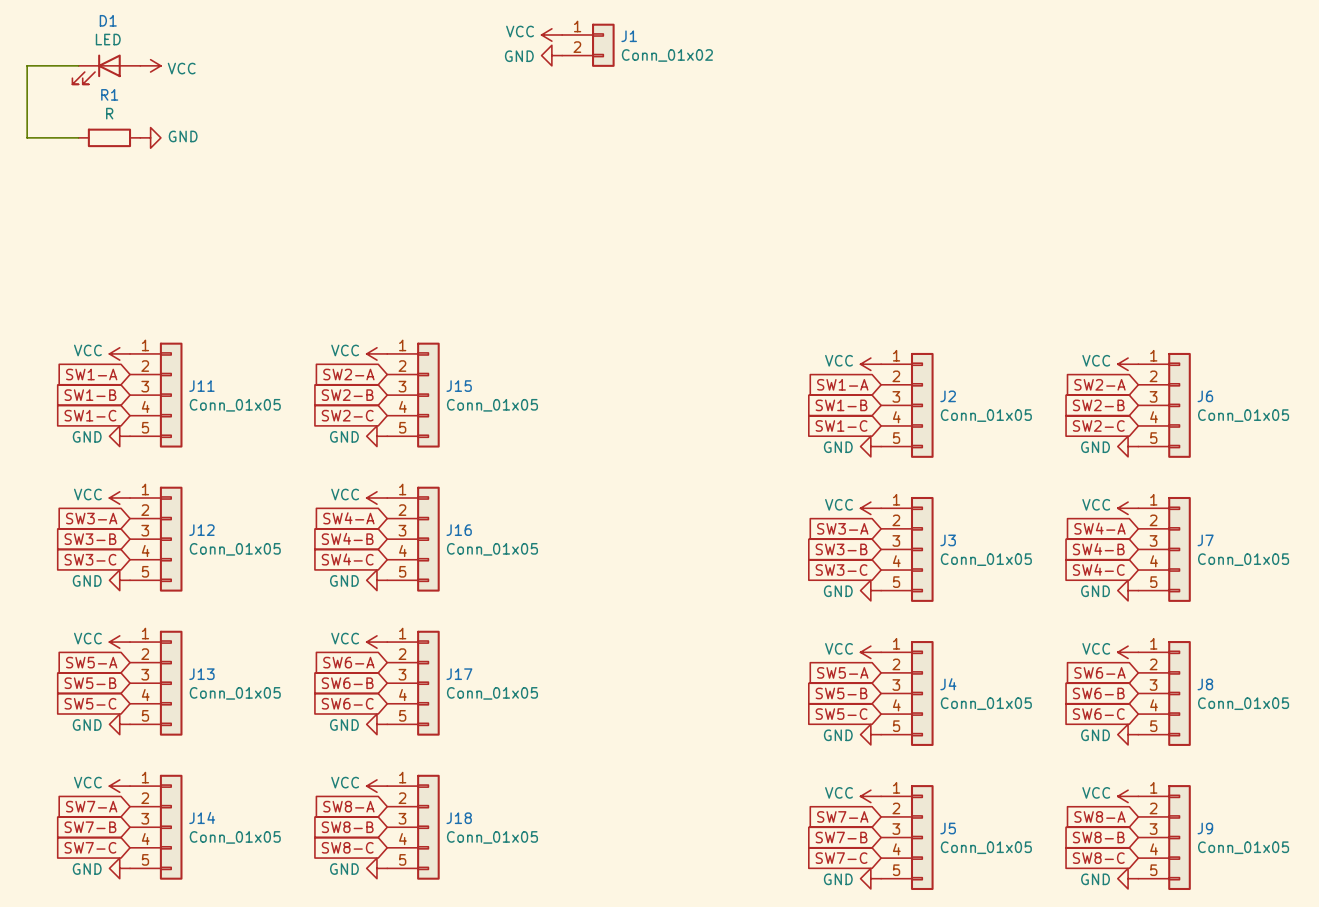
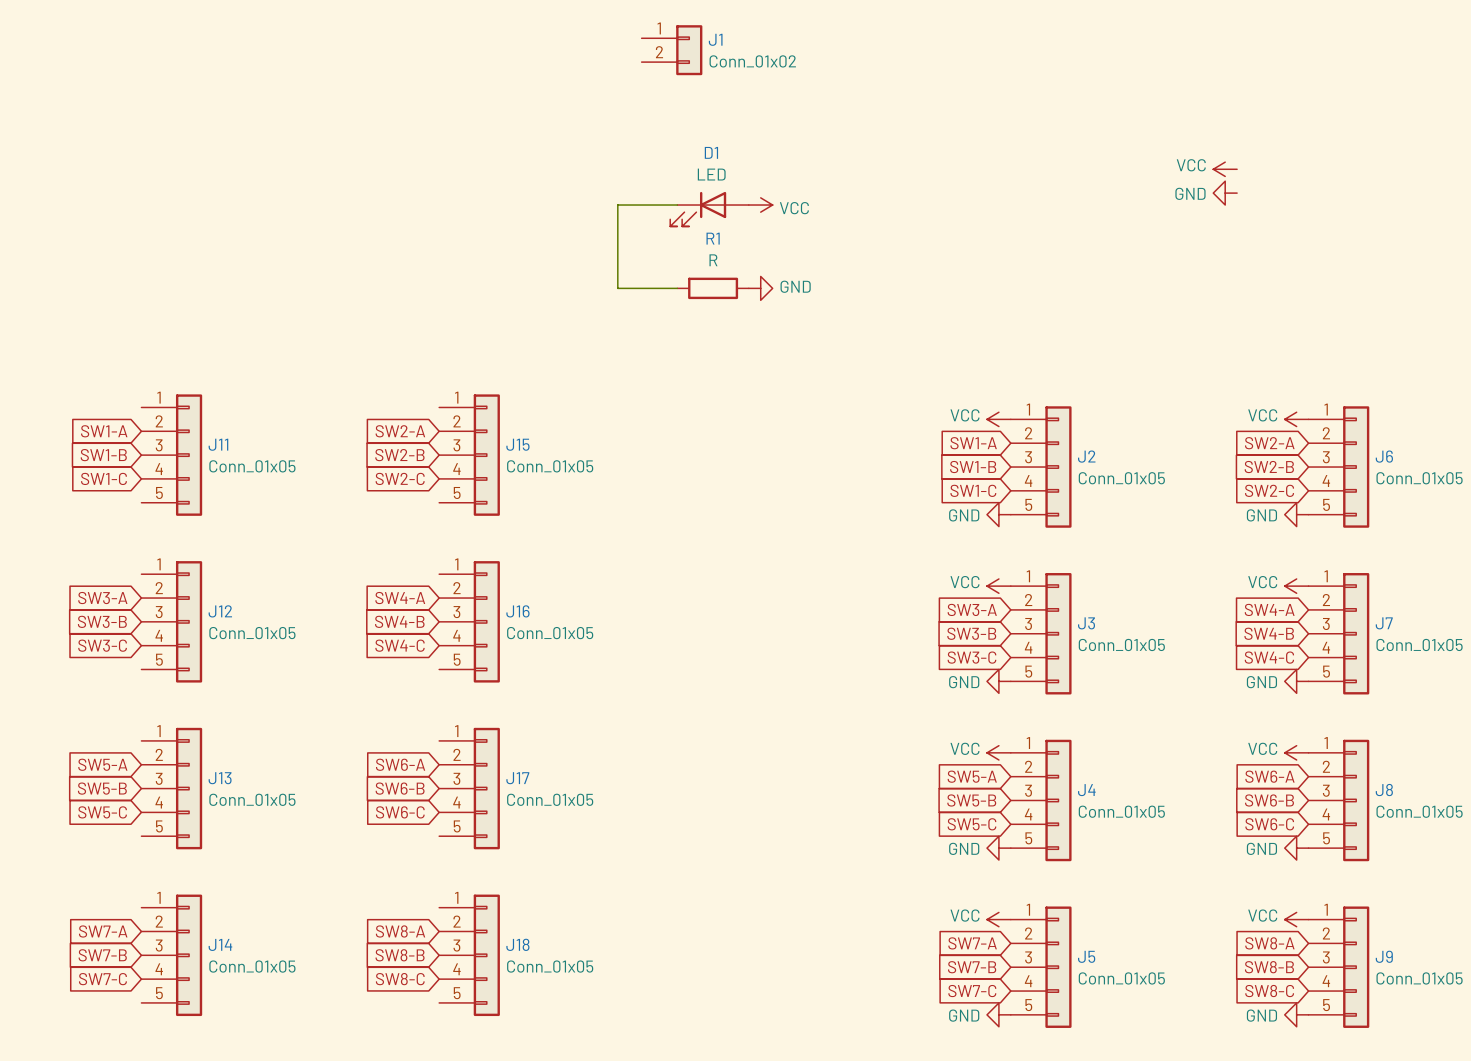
power symbol: VCC (551, 34) -> none
power symbol: GND (551, 55) -> none
wire: (78, 65) (27, 65) (27, 137) (78, 137) -> none
power symbol: VCC (150, 65) -> none
D1 position: (106, 69) -> (709, 209)
R1 position: (109, 137) -> (713, 288)
power symbol: GND (150, 137) -> none
power symbol: none -> VCC (1225, 169)
power symbol: none -> GND (1225, 193)
wire: none -> (677, 205) (617, 205) (617, 288) (677, 288)
power symbol: none -> VCC (760, 205)
power symbol: none -> GND (760, 288)
power symbol: VCC (119, 353) -> none
power symbol: VCC (376, 353) -> none
power symbol: GND (119, 436) -> none
power symbol: GND (376, 436) -> none
power symbol: VCC (119, 497) -> none
power symbol: VCC (376, 497) -> none
power symbol: GND (119, 580) -> none
power symbol: GND (376, 580) -> none
power symbol: VCC (119, 642) -> none
power symbol: VCC (376, 642) -> none
power symbol: GND (119, 724) -> none
power symbol: GND (376, 724) -> none
power symbol: VCC (119, 786) -> none
power symbol: VCC (376, 786) -> none
power symbol: GND (119, 868) -> none
power symbol: GND (376, 868) -> none

